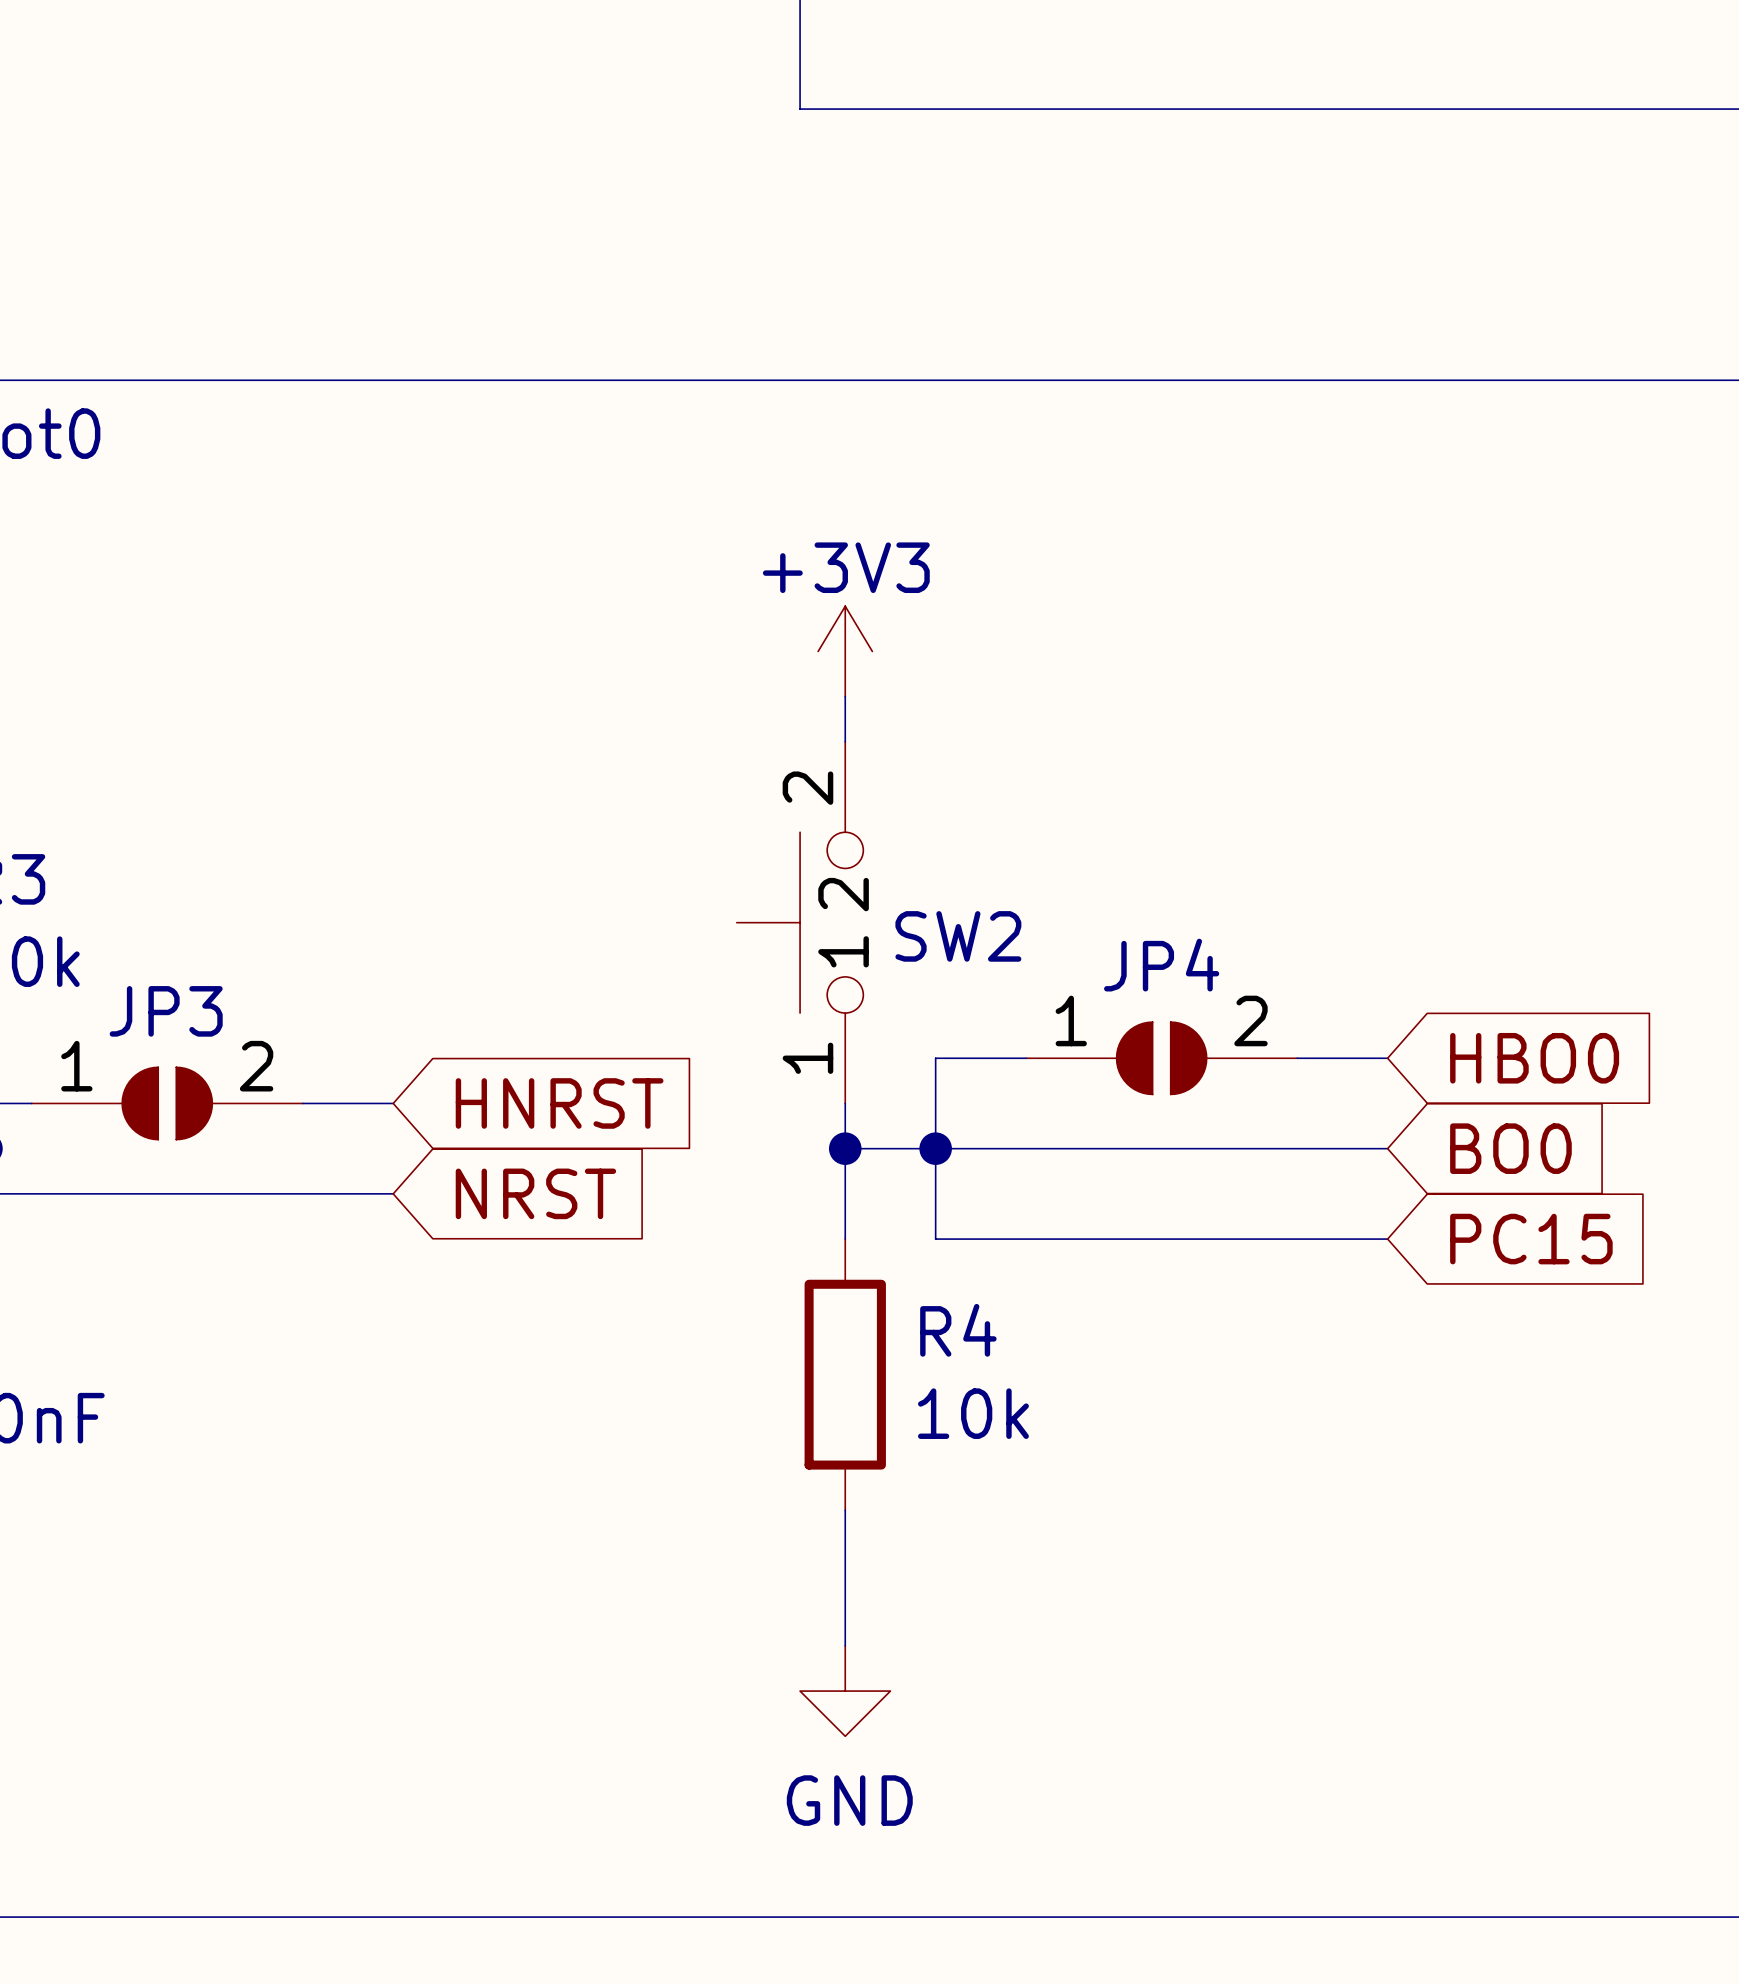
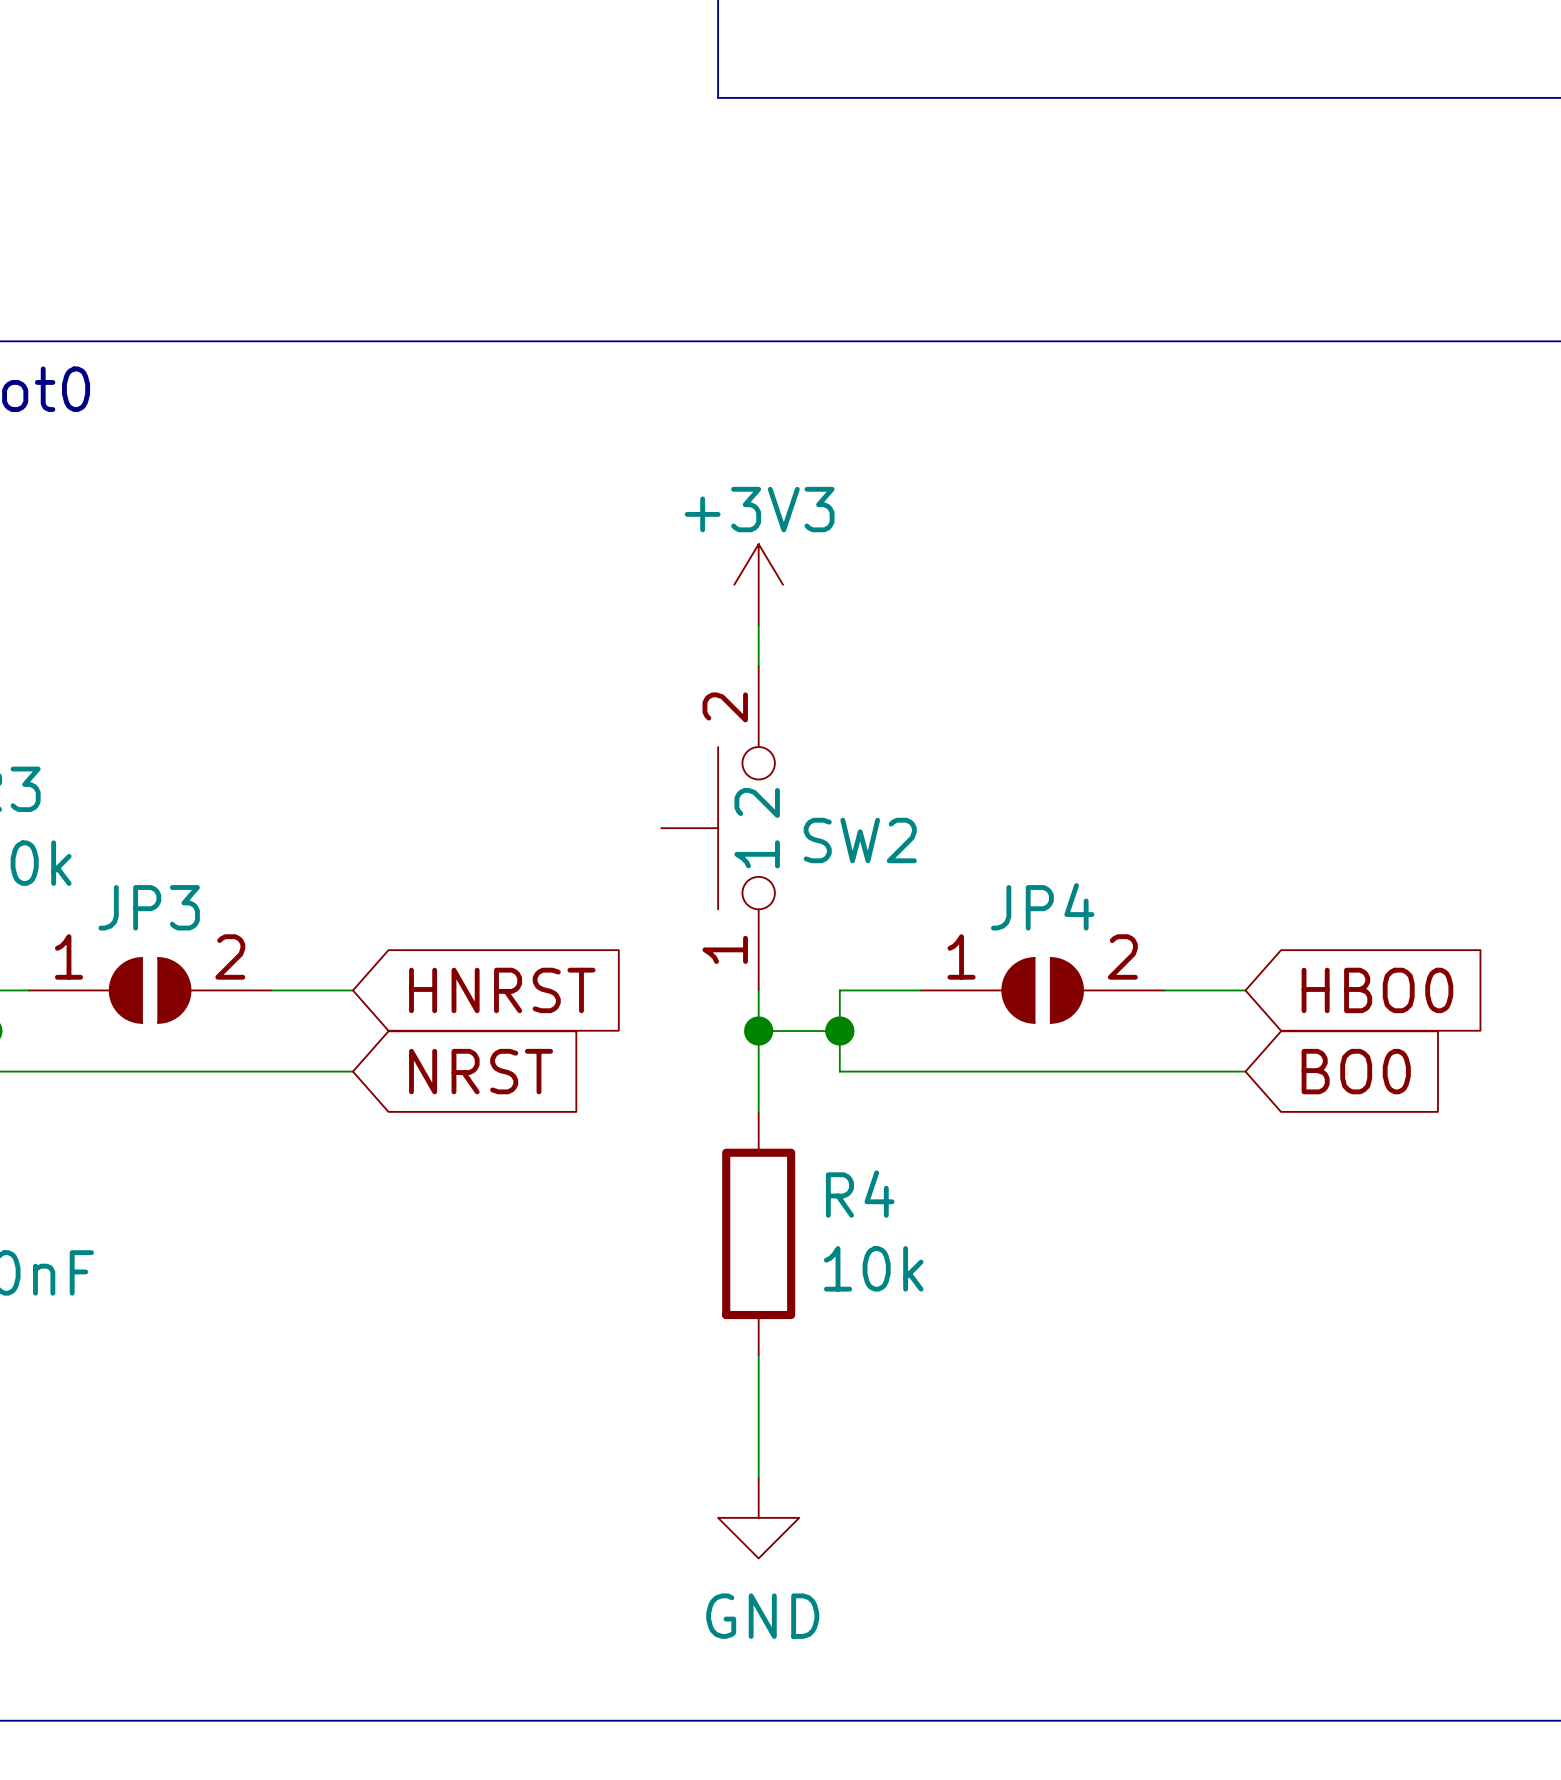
wire: (1026, 1058) (935, 1058) (935, 1103) -> (920, 990) (839, 990)
JP4 position: (1161, 1058) -> (1042, 990)
wire: (1297, 1058) (1387, 1058) -> (1164, 990) (1245, 990)
global label position: HBO0 (1534, 1058) -> HBO0 (1377, 990)
wire: (935, 1148) (1387, 1148) -> none
global label position: BO0 (1510, 1148) -> BO0 (1356, 1071)
wire: (935, 1193) (935, 1239) (1387, 1239) -> (839, 1071) (1245, 1071)
global label: PC15 (1531, 1239) -> none

